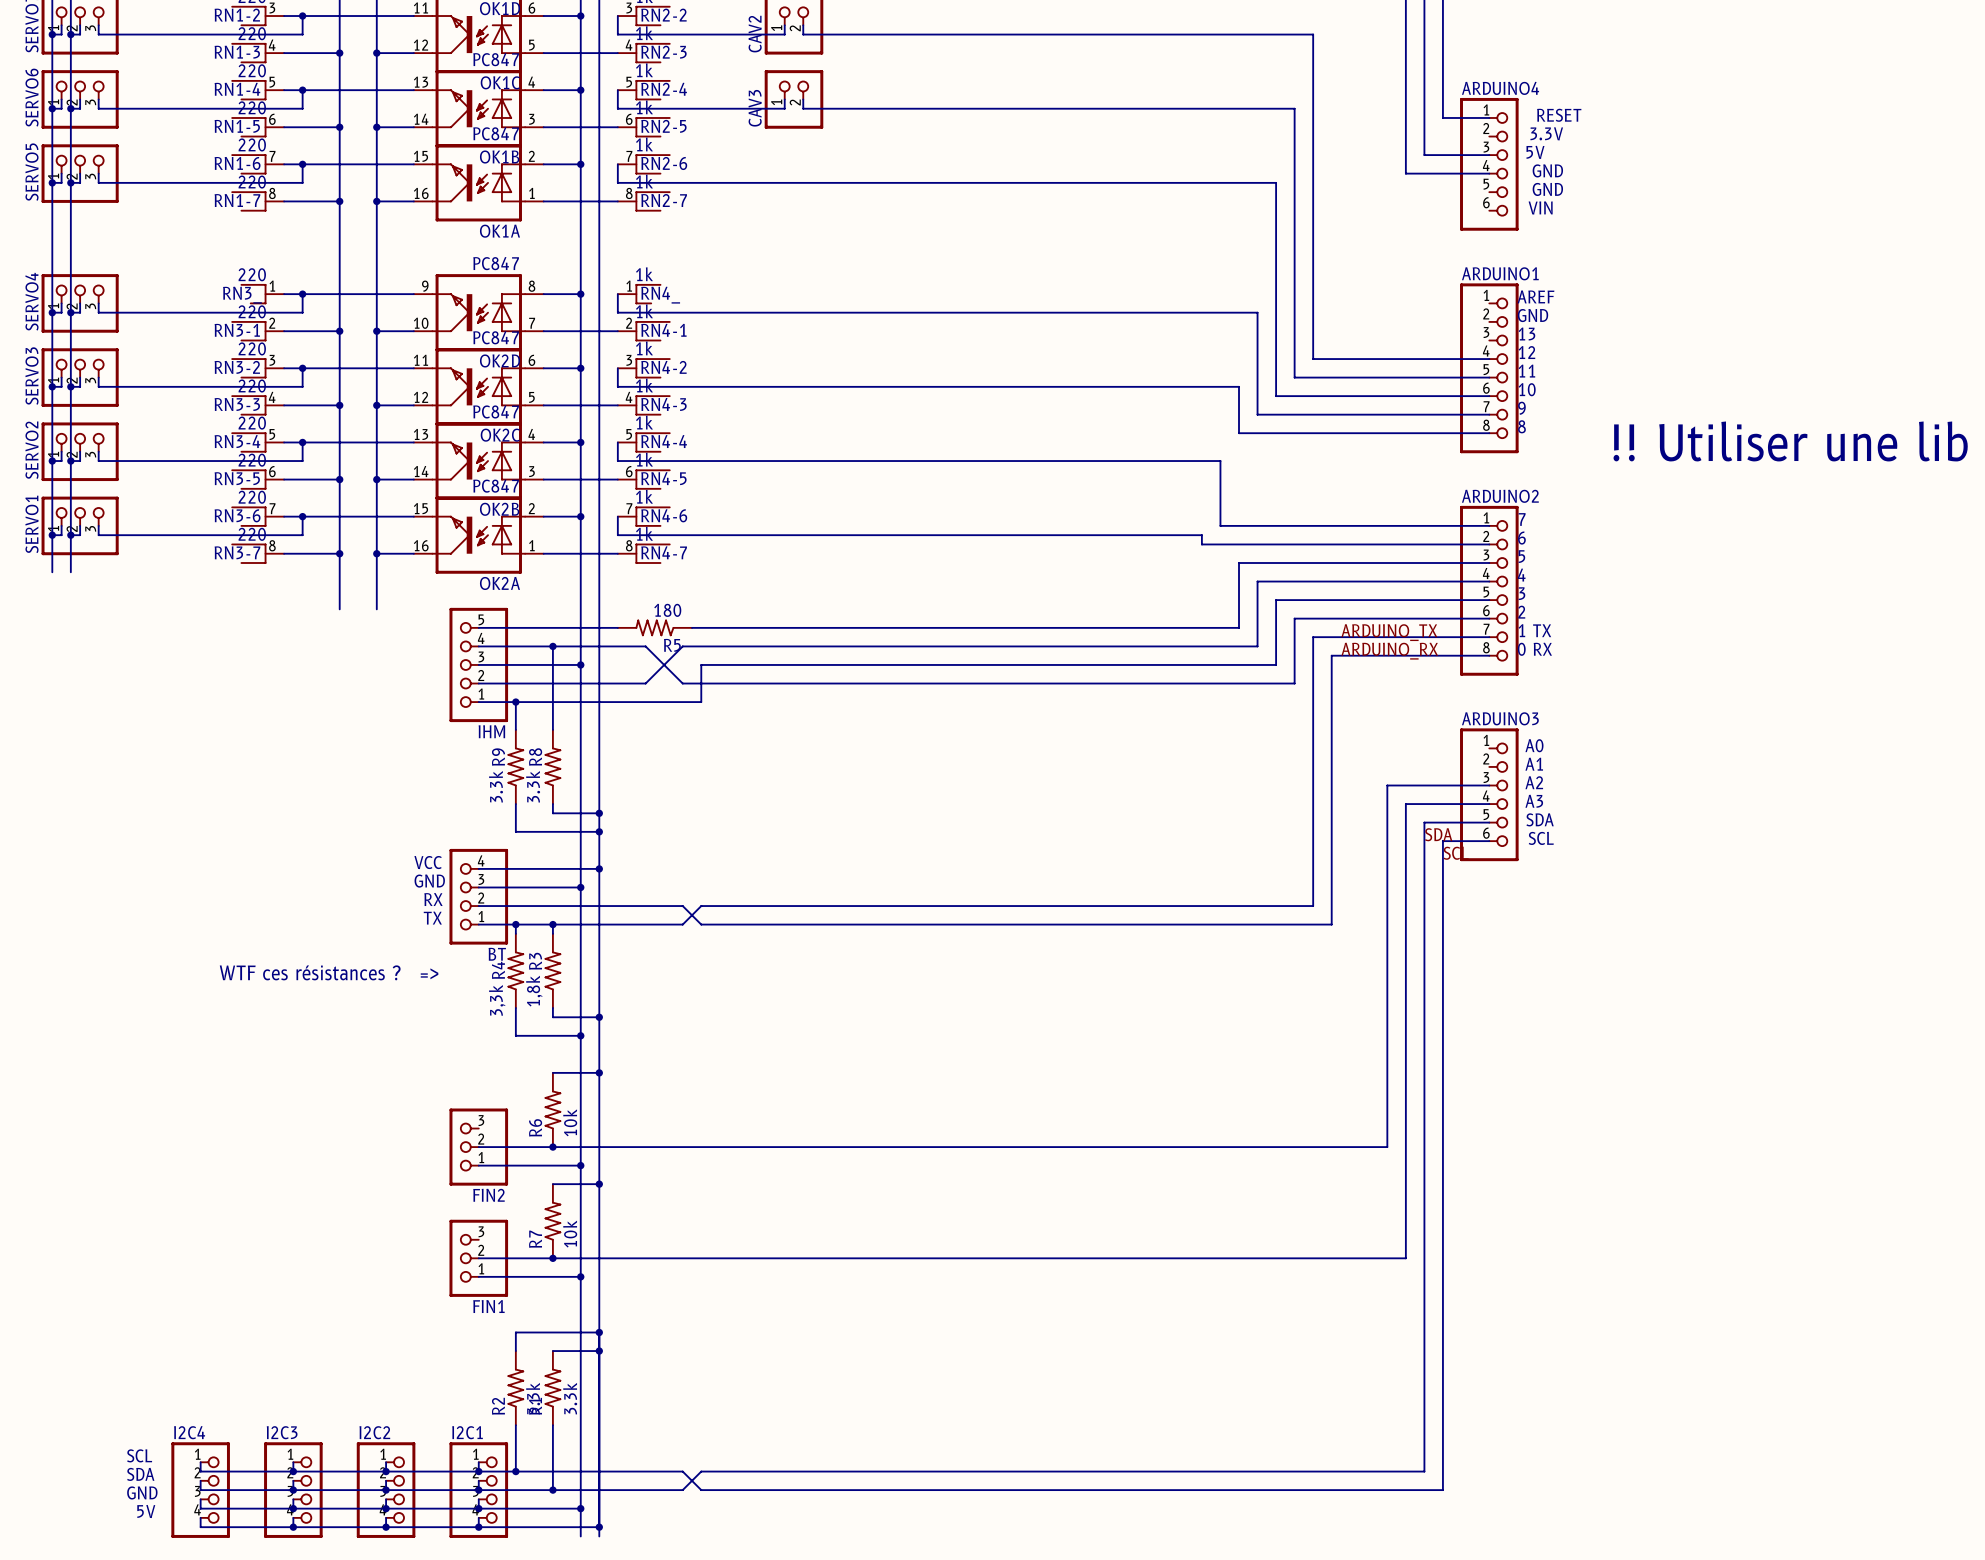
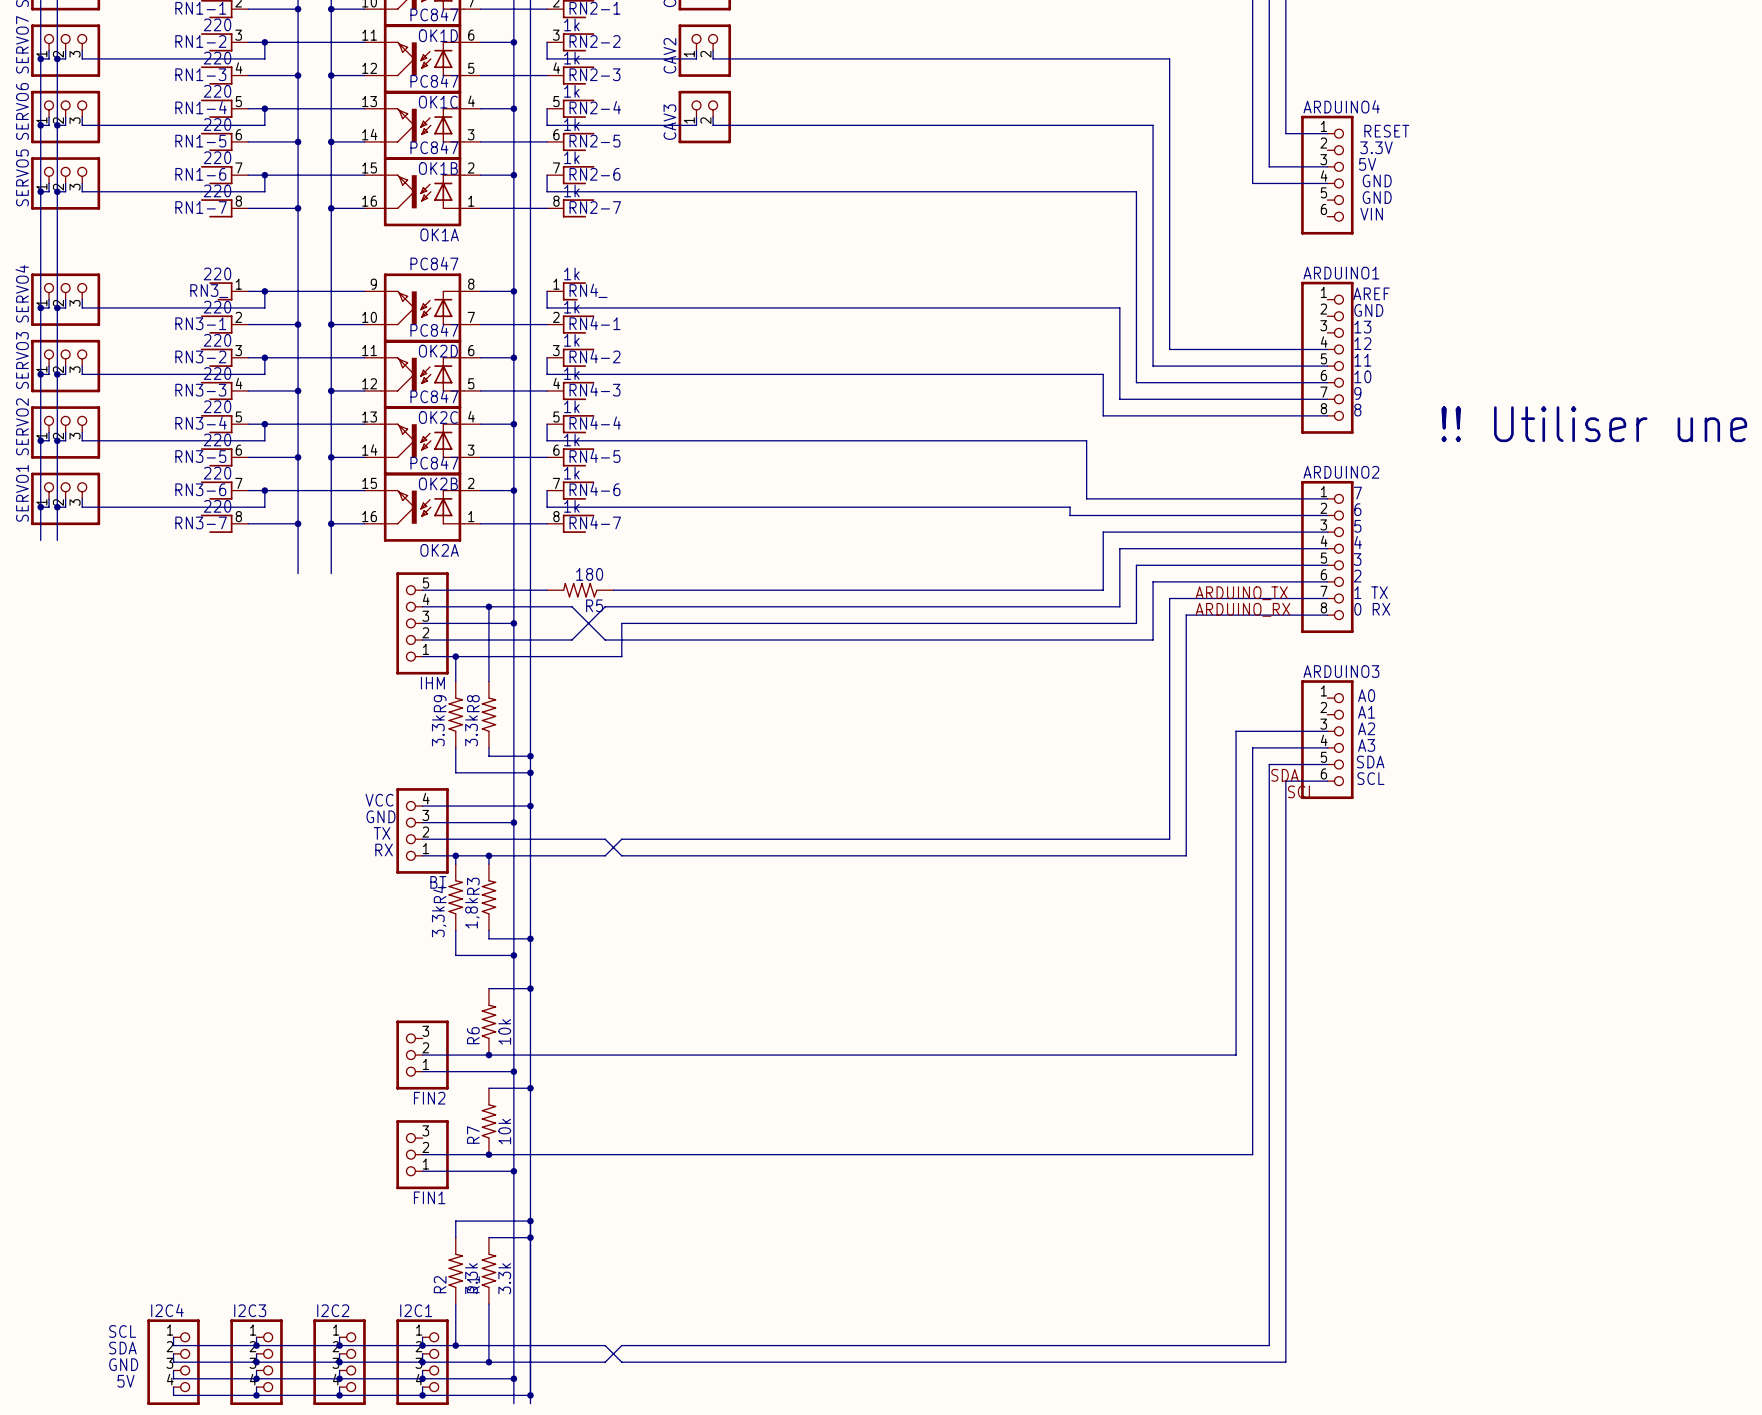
text: RX (433, 899) -> TX (382, 833)
text: TX (432, 918) -> RX (384, 850)
text: WTF ces résistances ? => (329, 972) -> none

